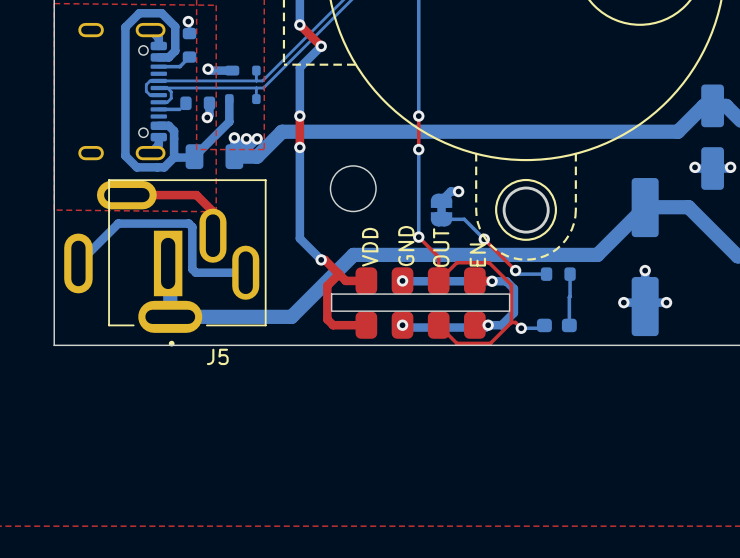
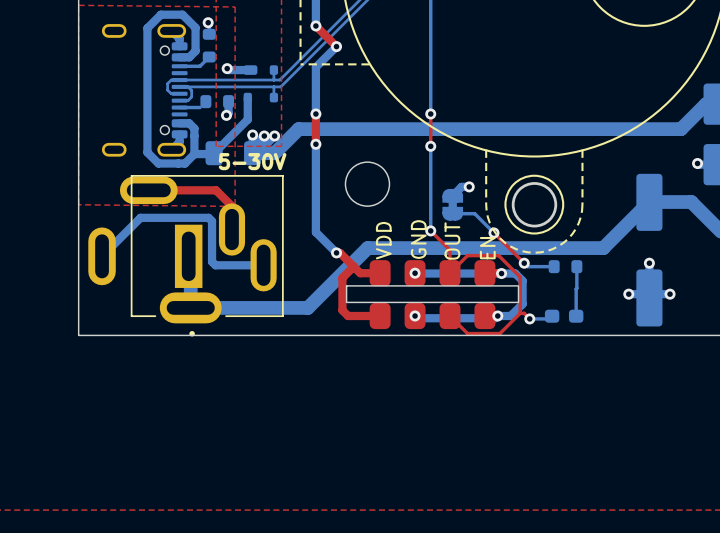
J5 text: none -> 5-30V (252, 161)
J5 name: J5 (217, 356) -> none

